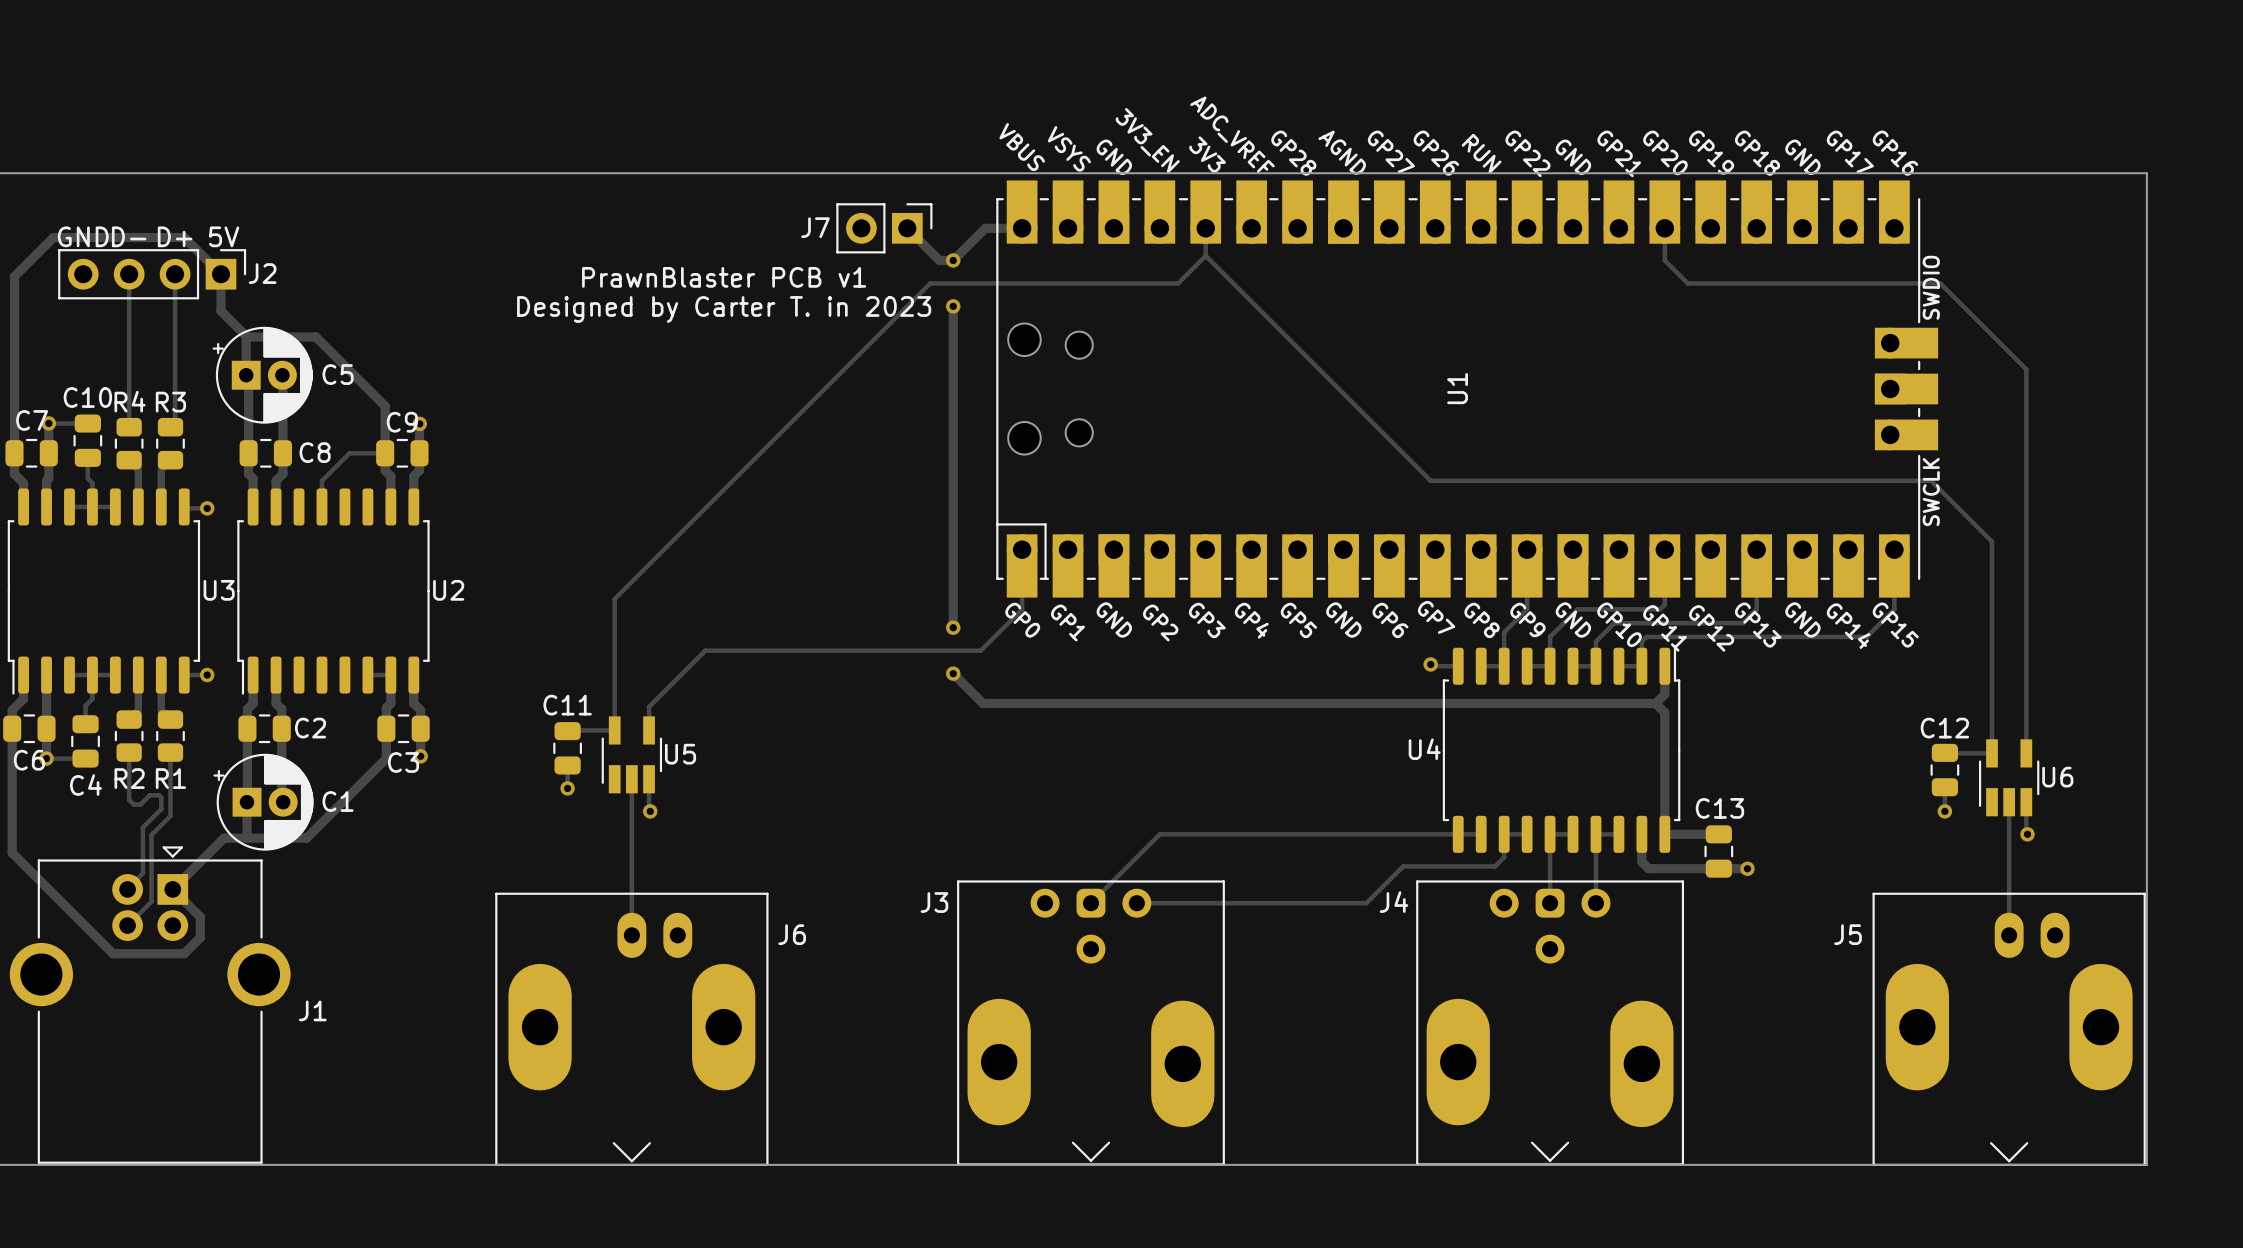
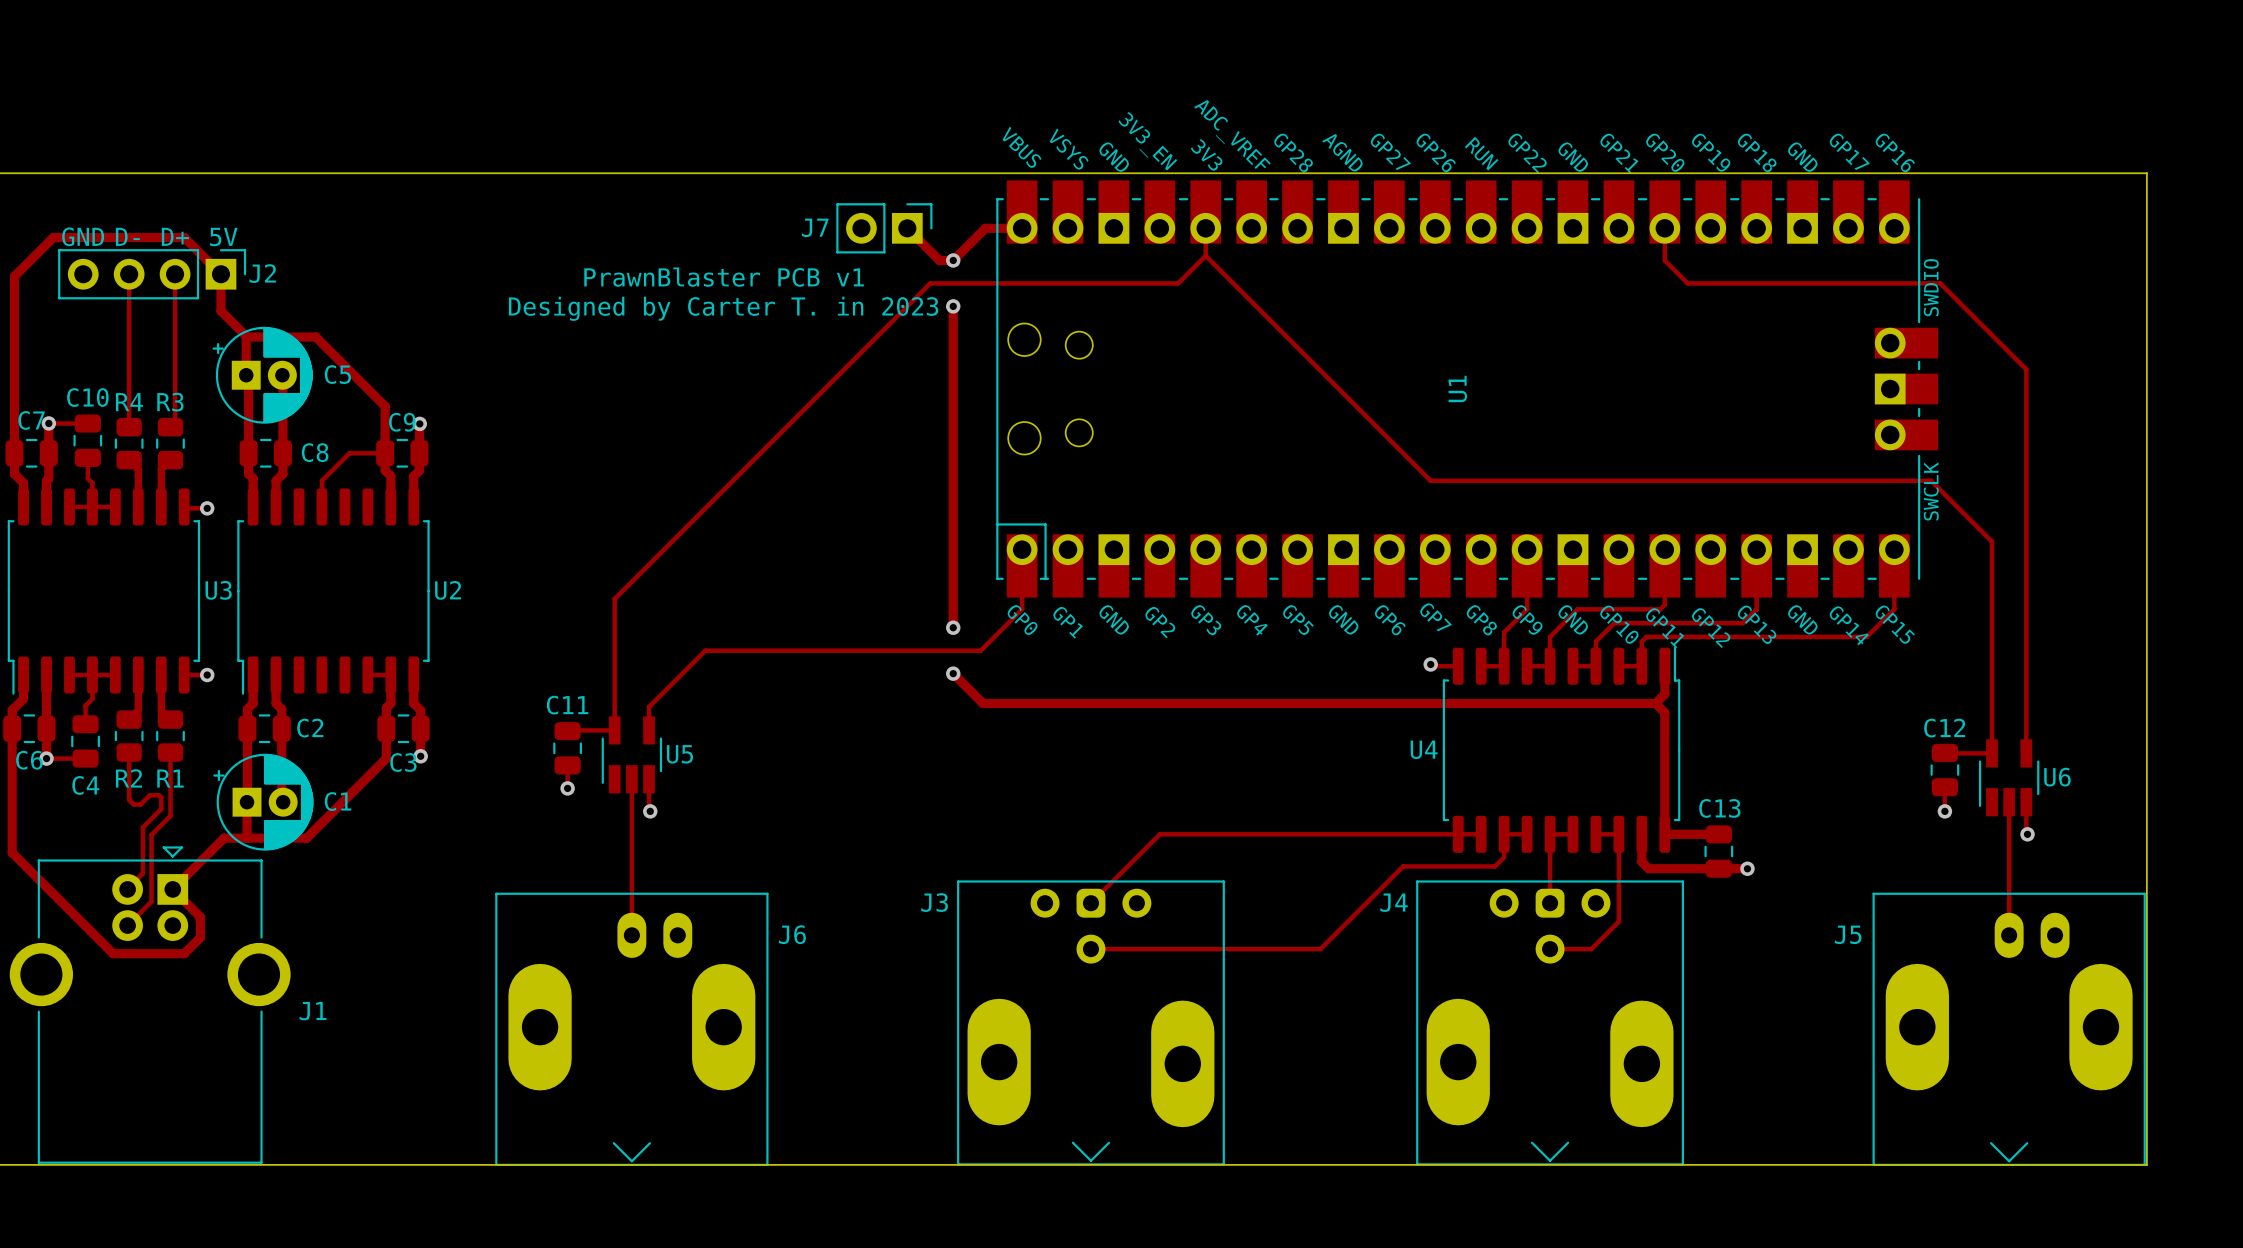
track: (1595, 834) (1595, 903) -> none
track: none -> (1618, 834) (1618, 921) (1591, 949) (1550, 949)
track: (1136, 903) (1366, 903) -> (1090, 949) (1320, 949) (1366, 903)

